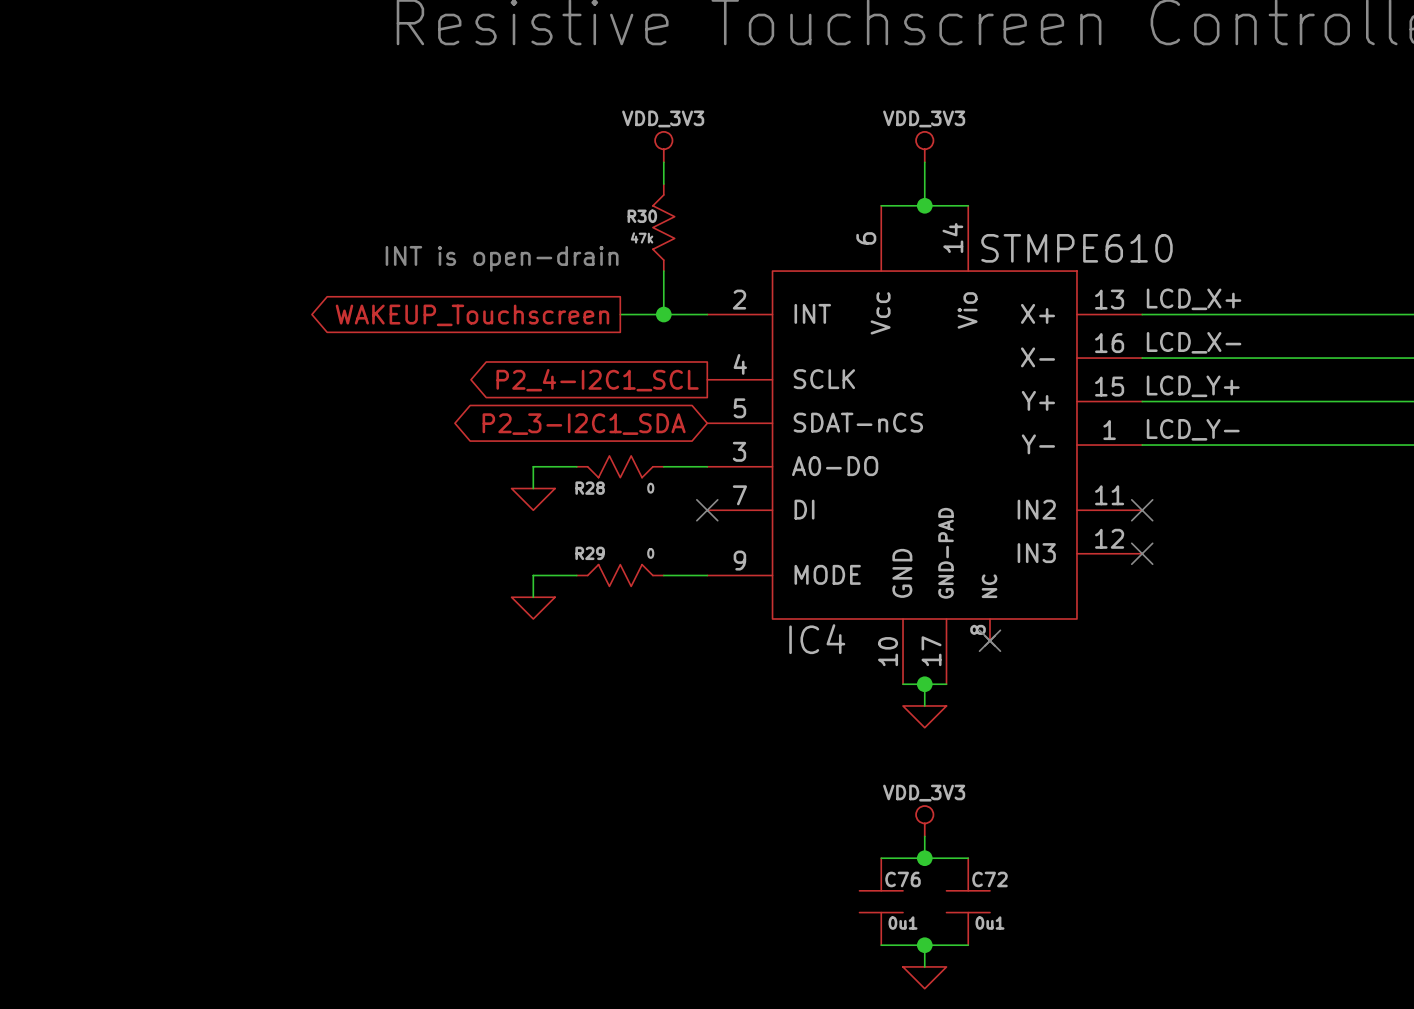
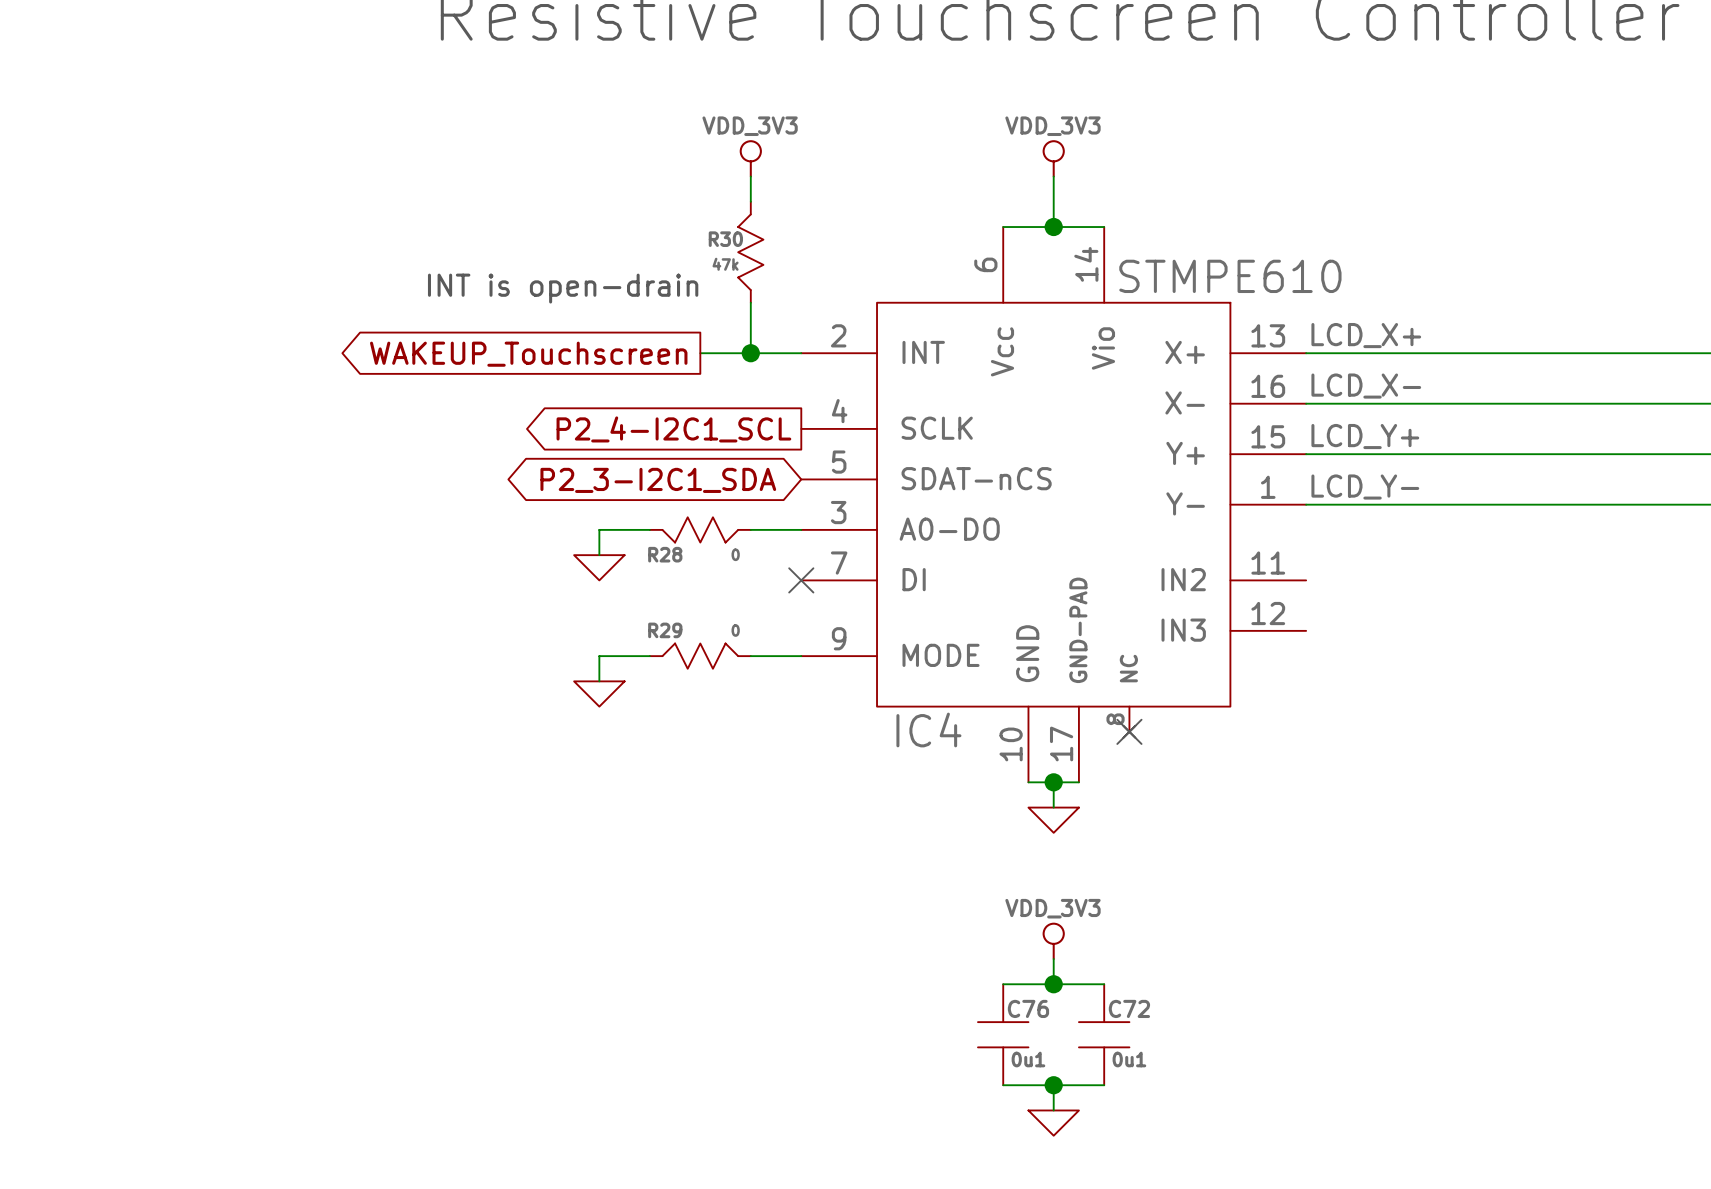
no-connect mark: (1142, 510) -> none
no-connect mark: (1142, 553) -> none

